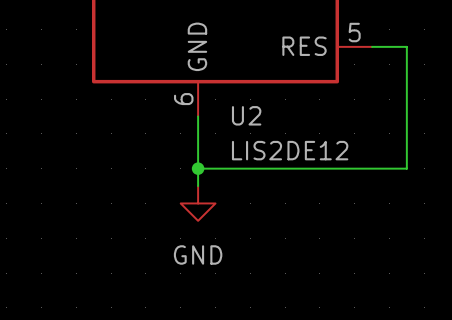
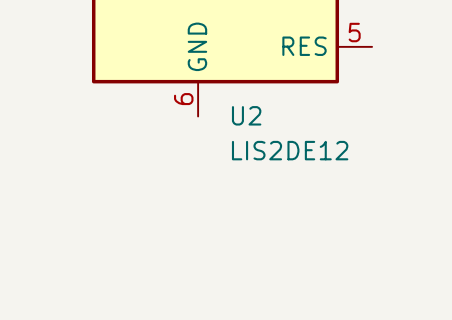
wire: (372, 46) (406, 46) (406, 168) (198, 168) -> none
wire: (198, 116) (198, 186) -> none
junction: (198, 168) -> none
power symbol: GND (198, 203) -> none

